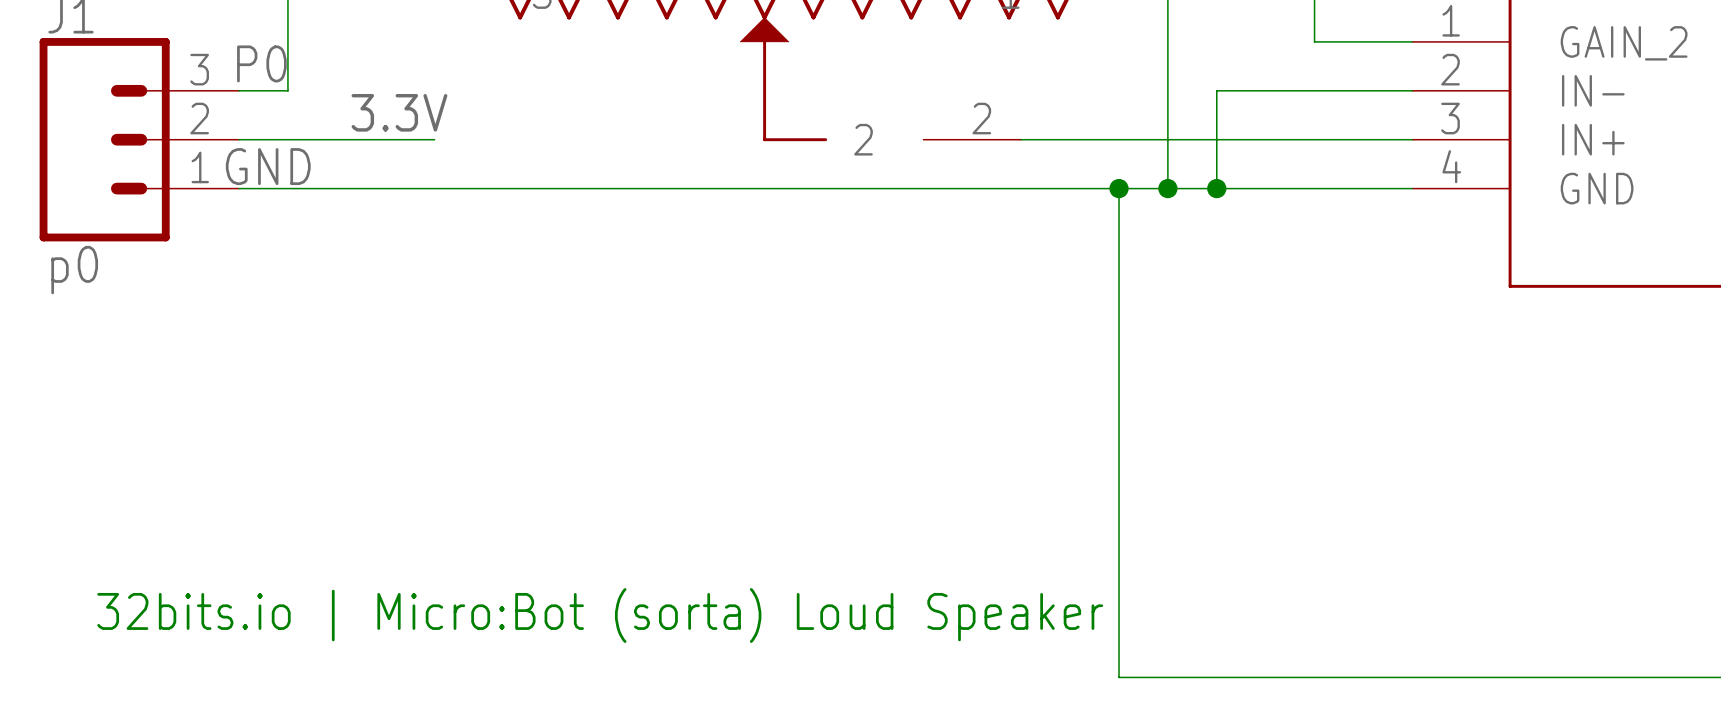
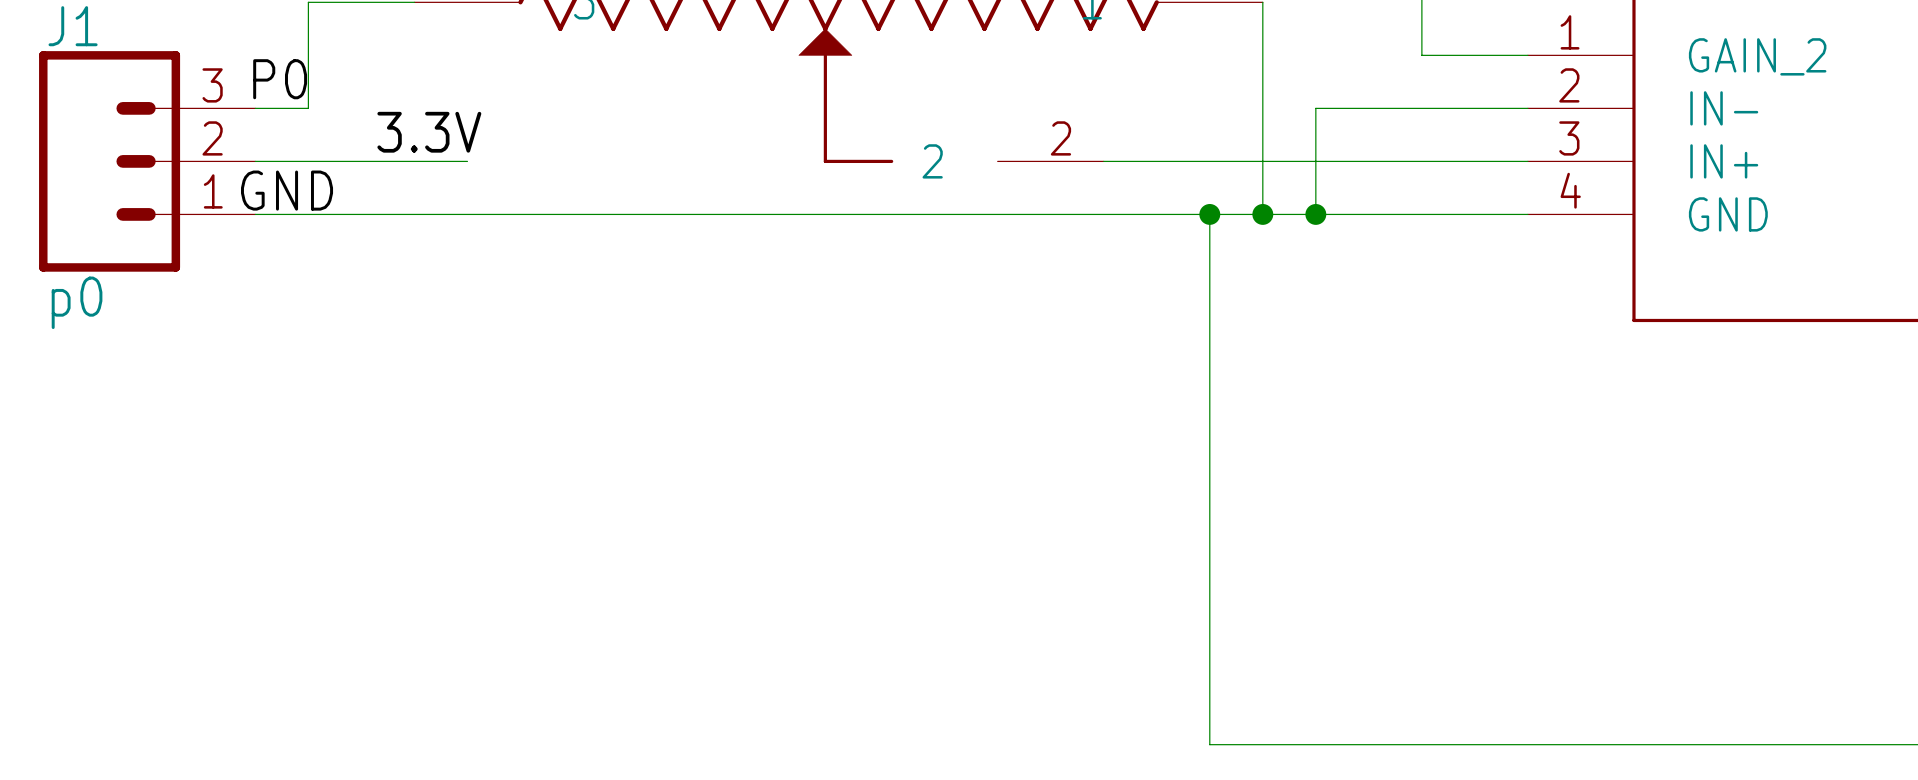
text: 32bits.io | Micro:Bot (sorta) Loud Speaker (600, 615) -> none

